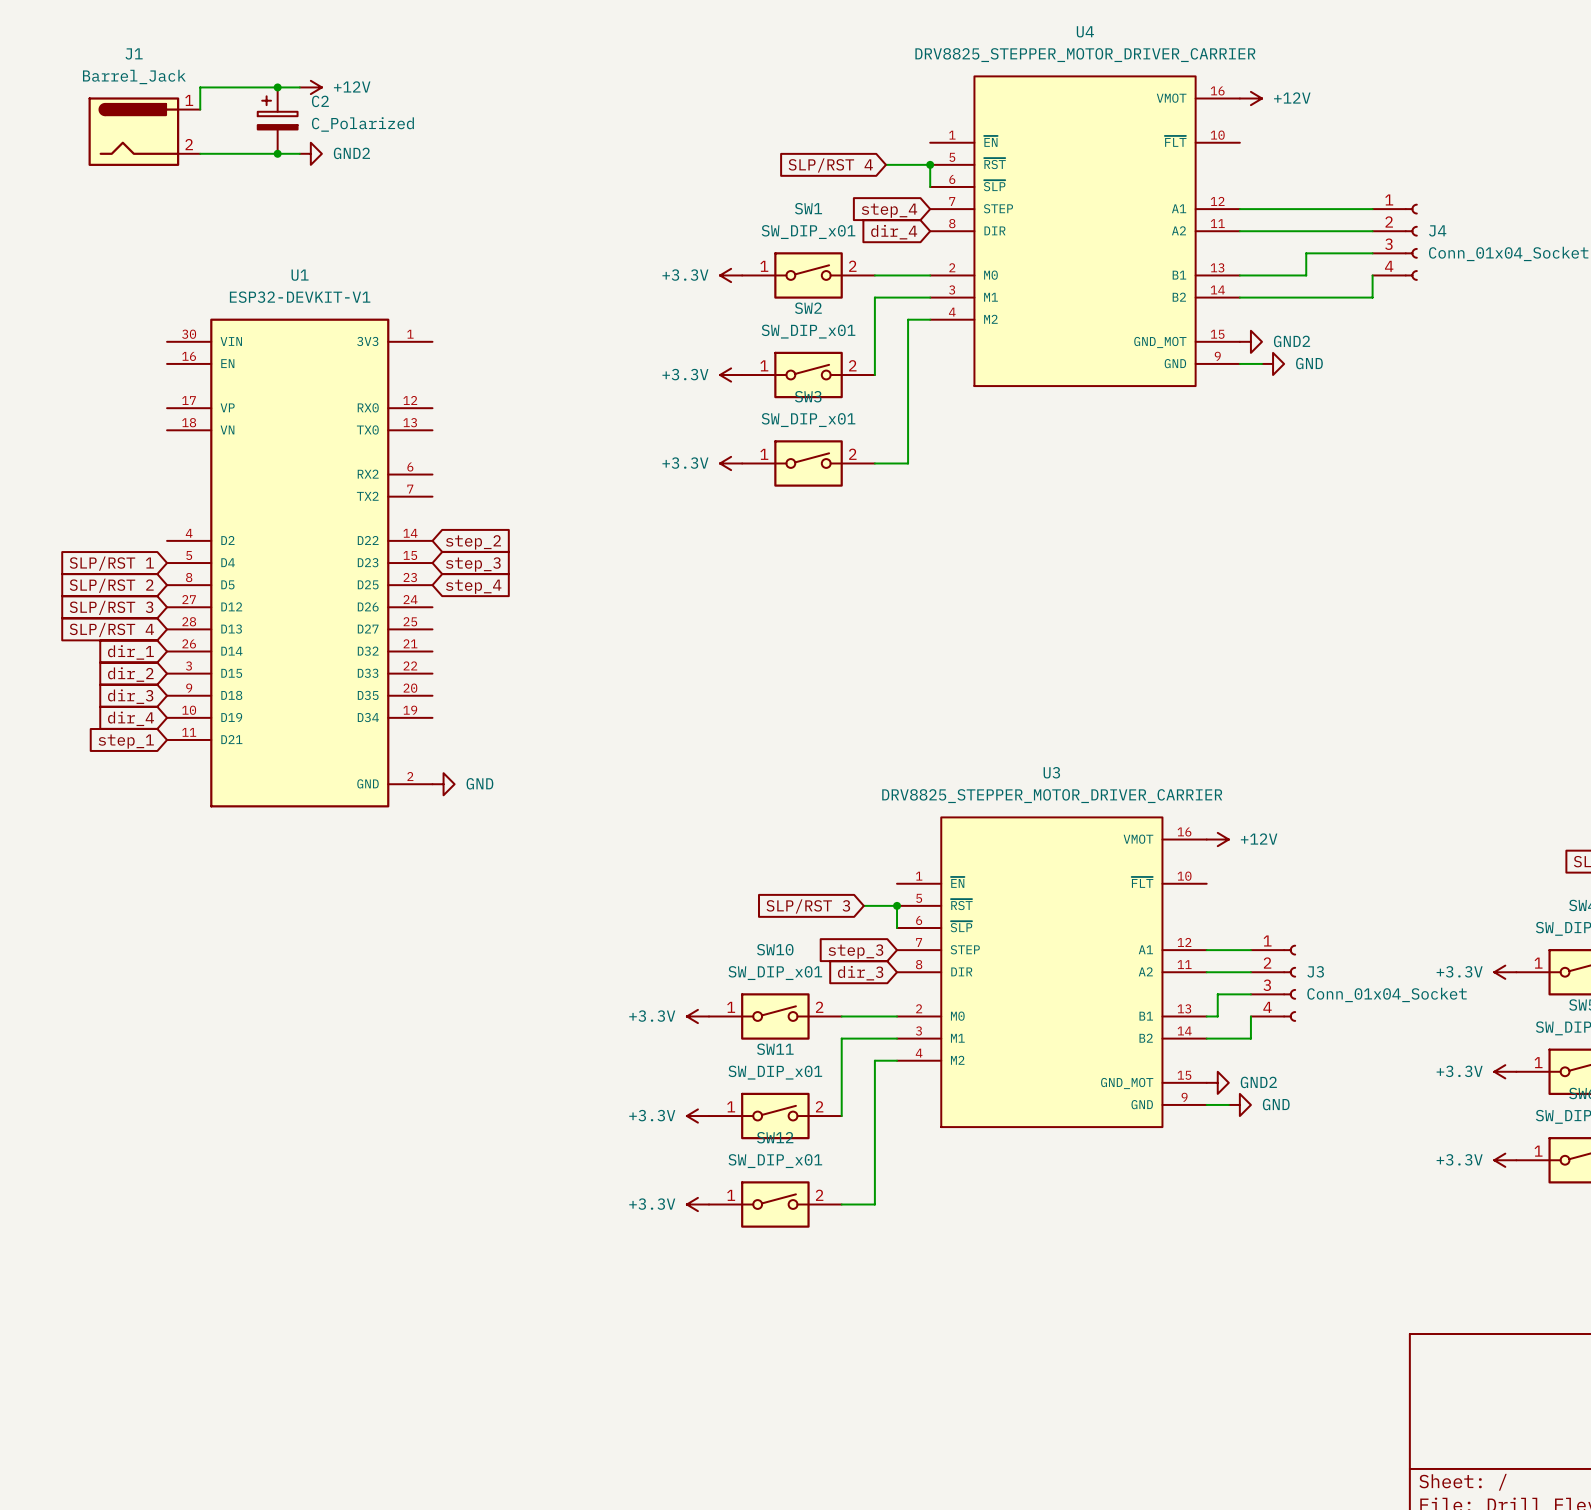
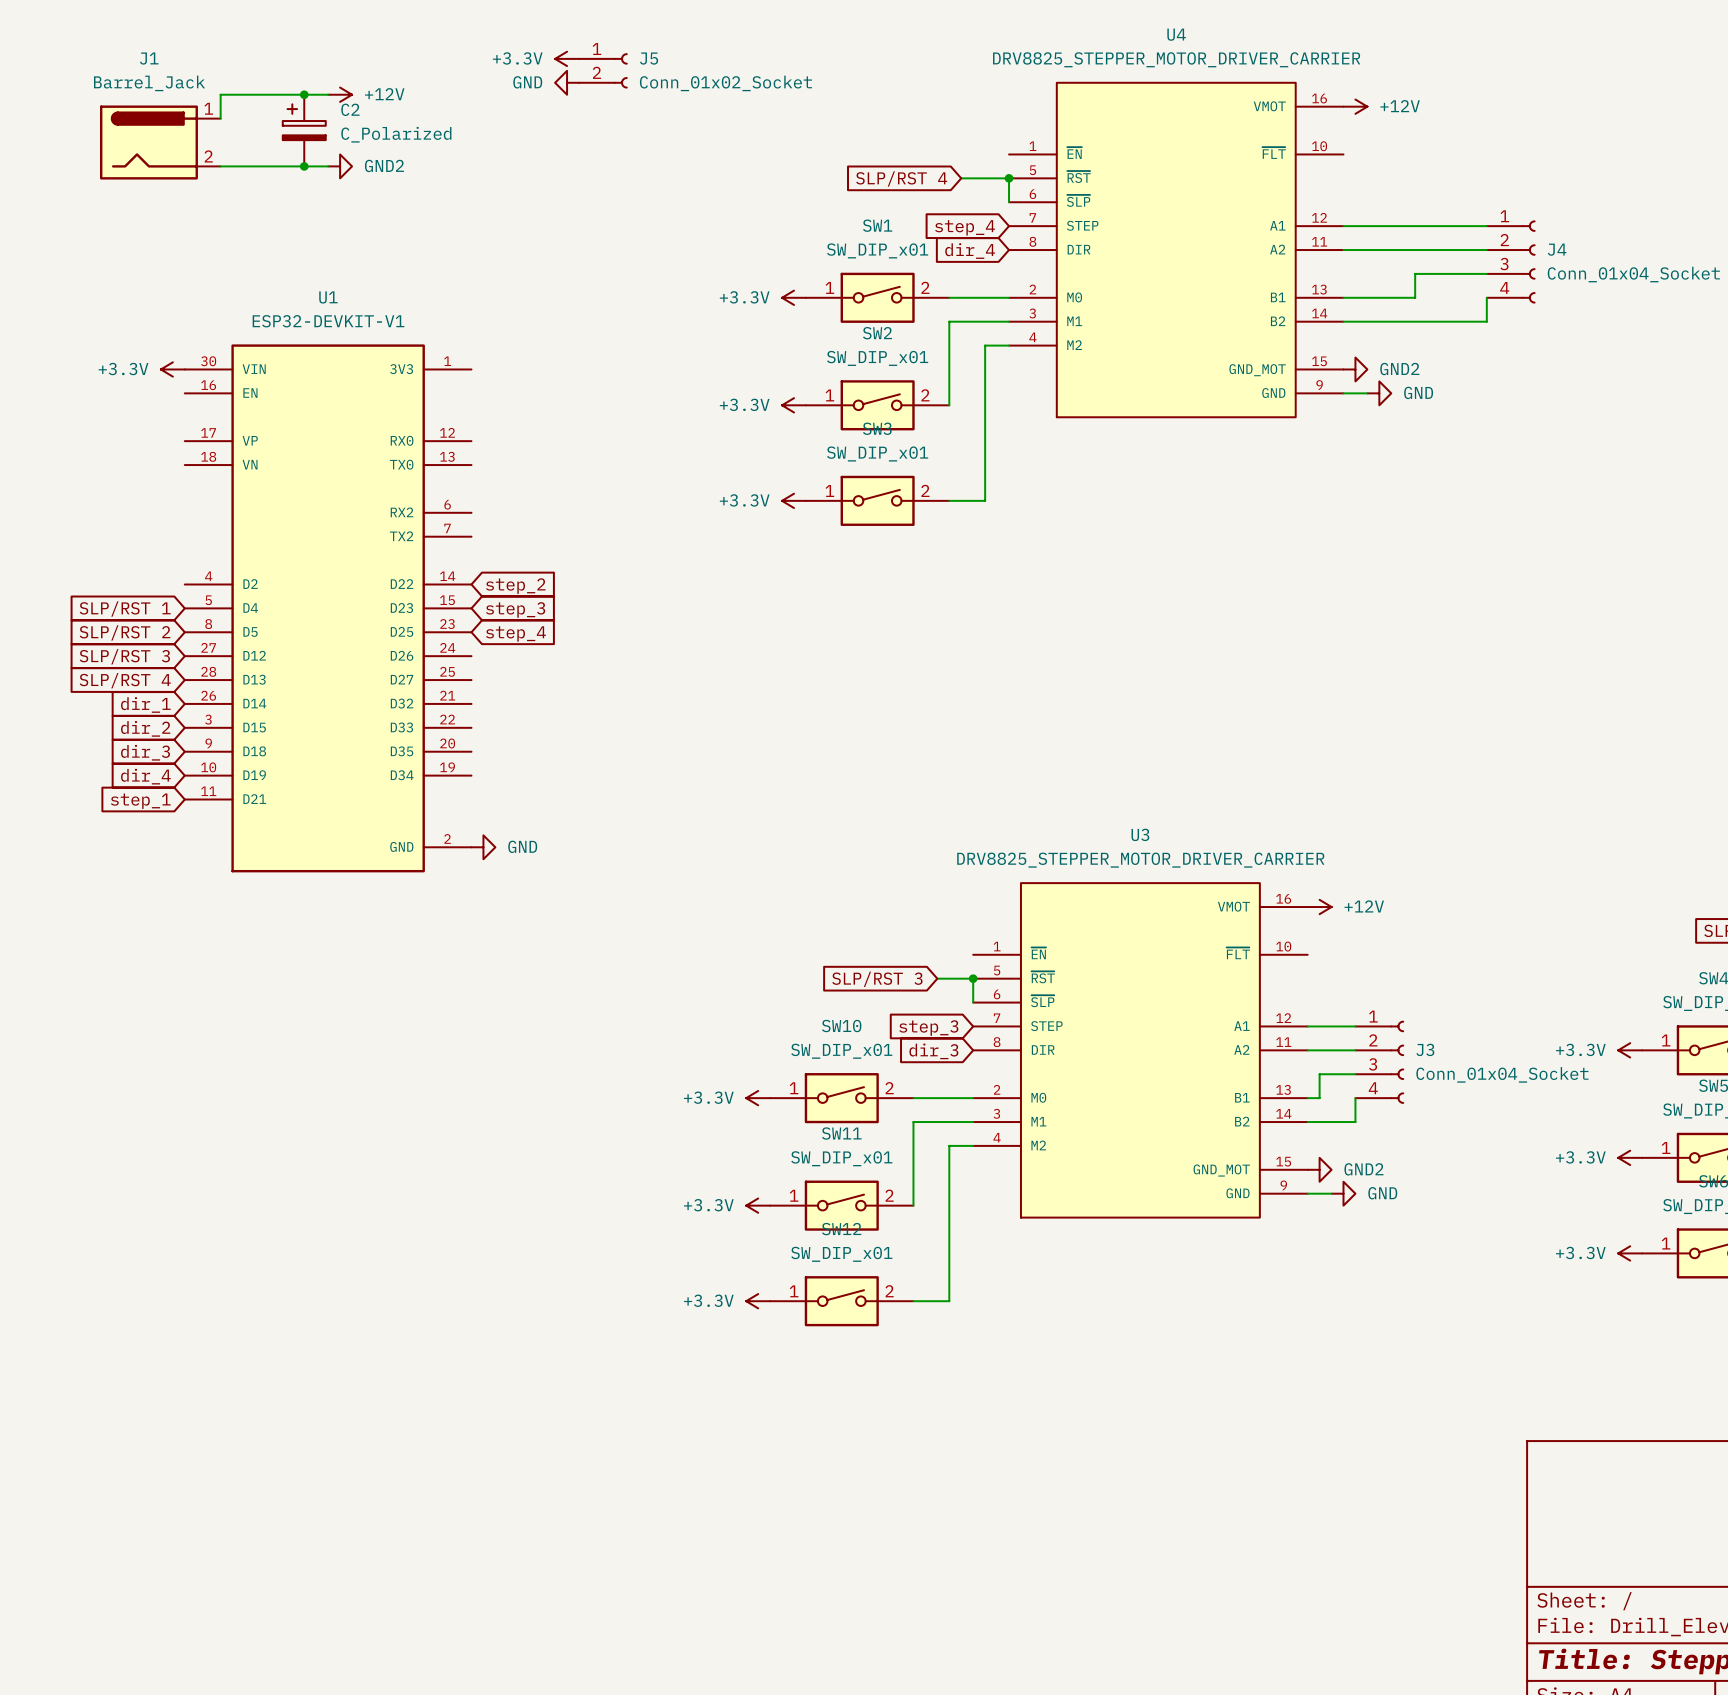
power symbol: none -> +3.3V (567, 58)
J5: none -> Conn_01x02_Socket (603, 70)
power symbol: none -> GND (567, 82)
power symbol: none -> +3.3V (172, 369)

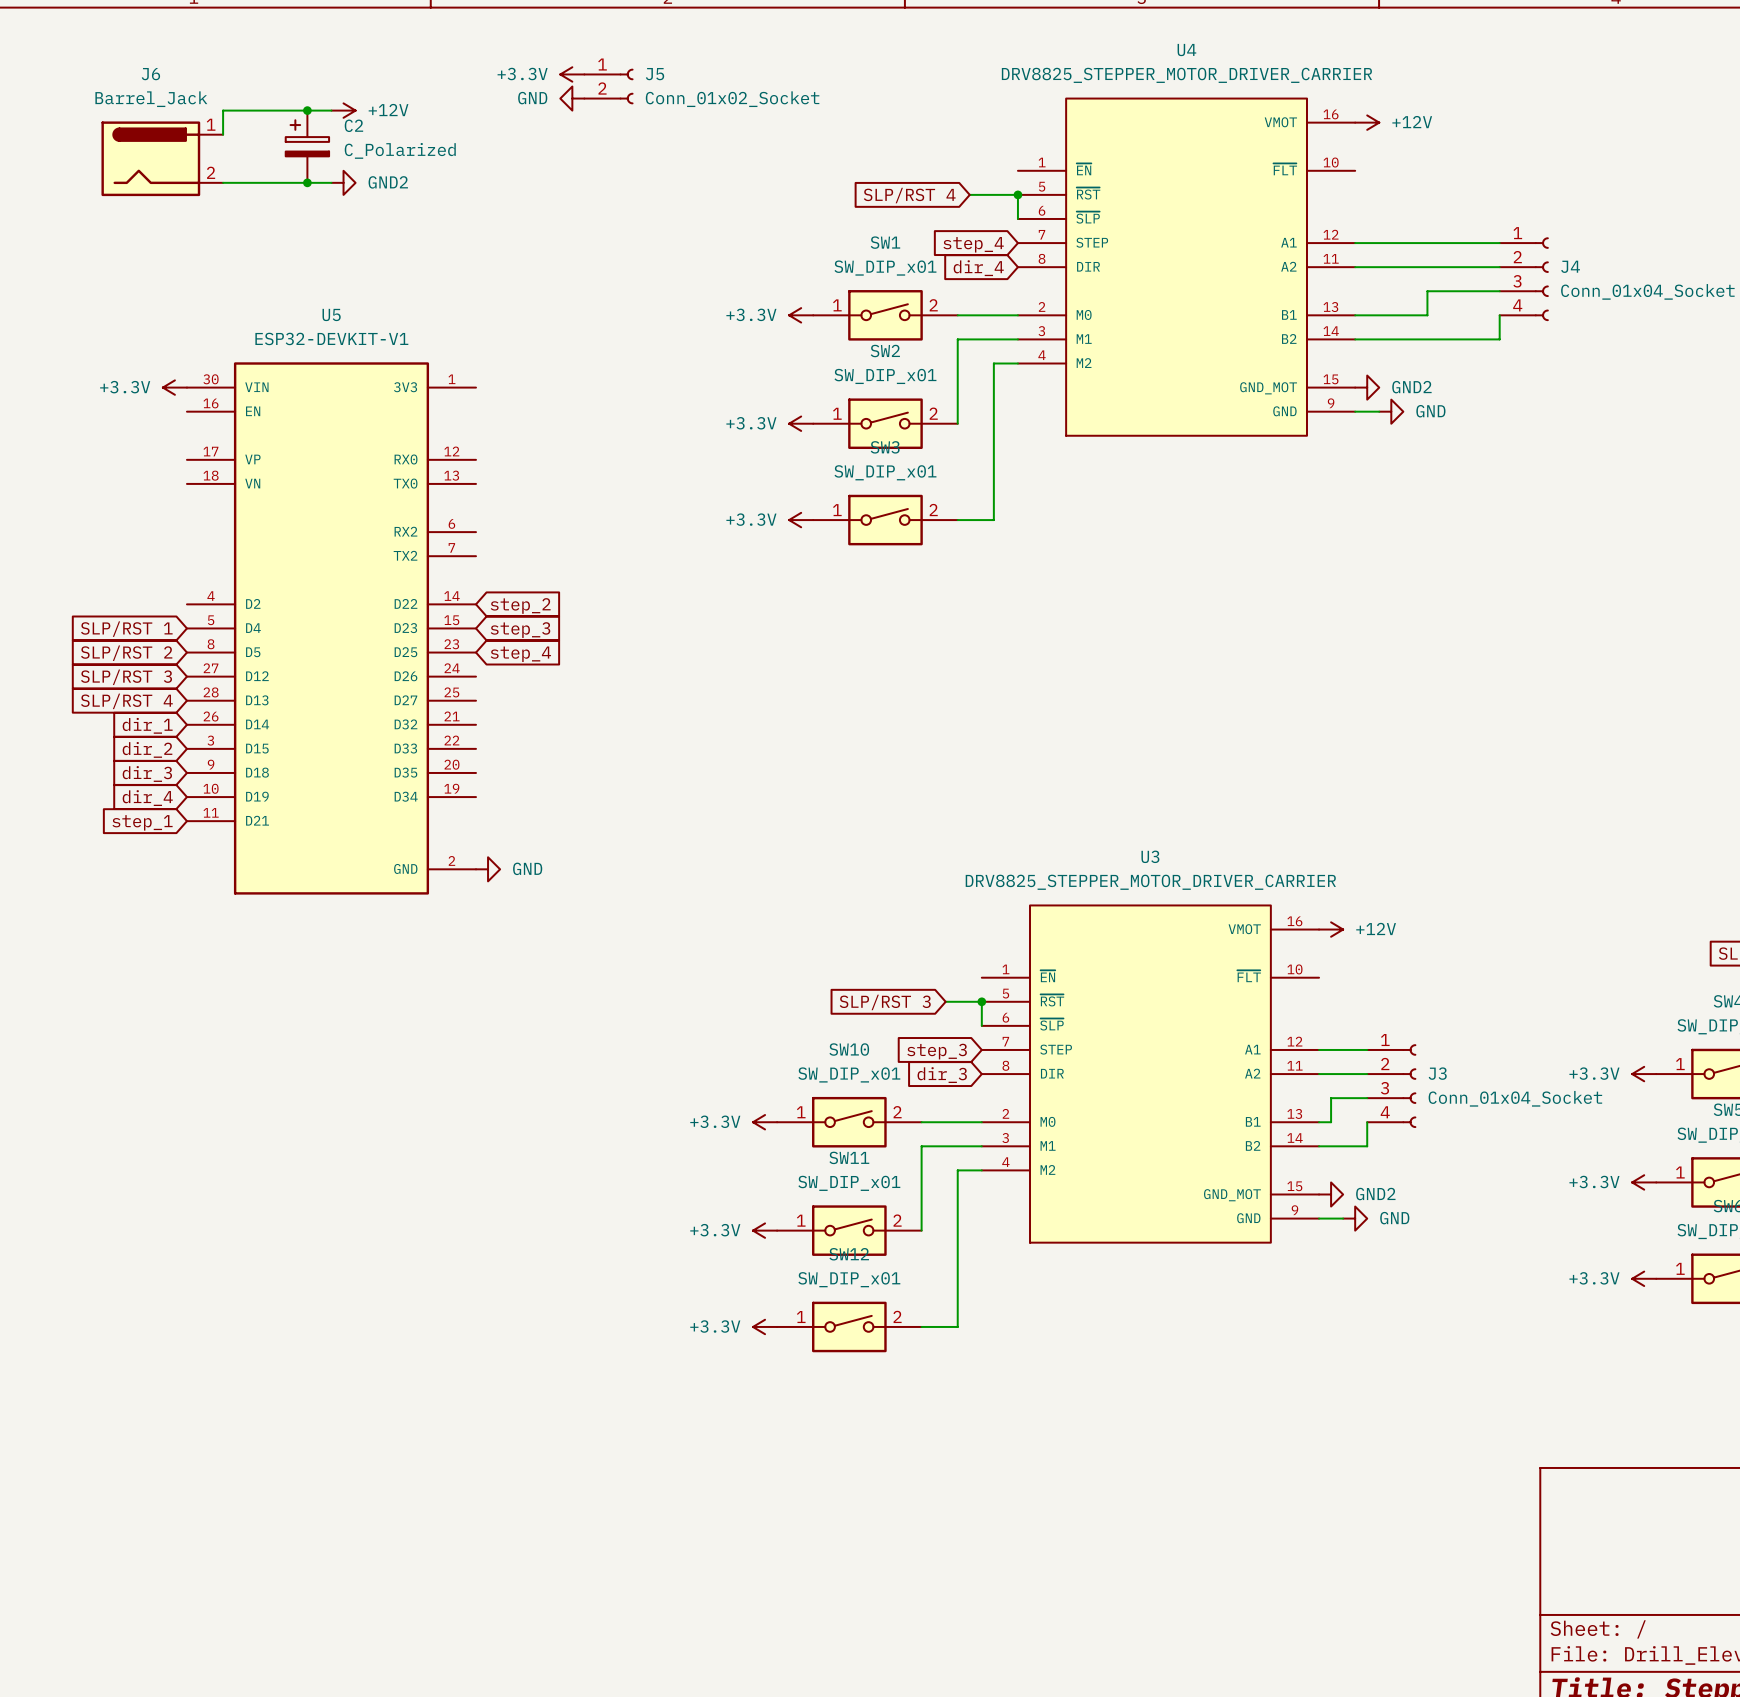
J1 name: J1 (149, 58) -> J6 (150, 74)
U1 name: U1 (328, 297) -> U5 (331, 314)

